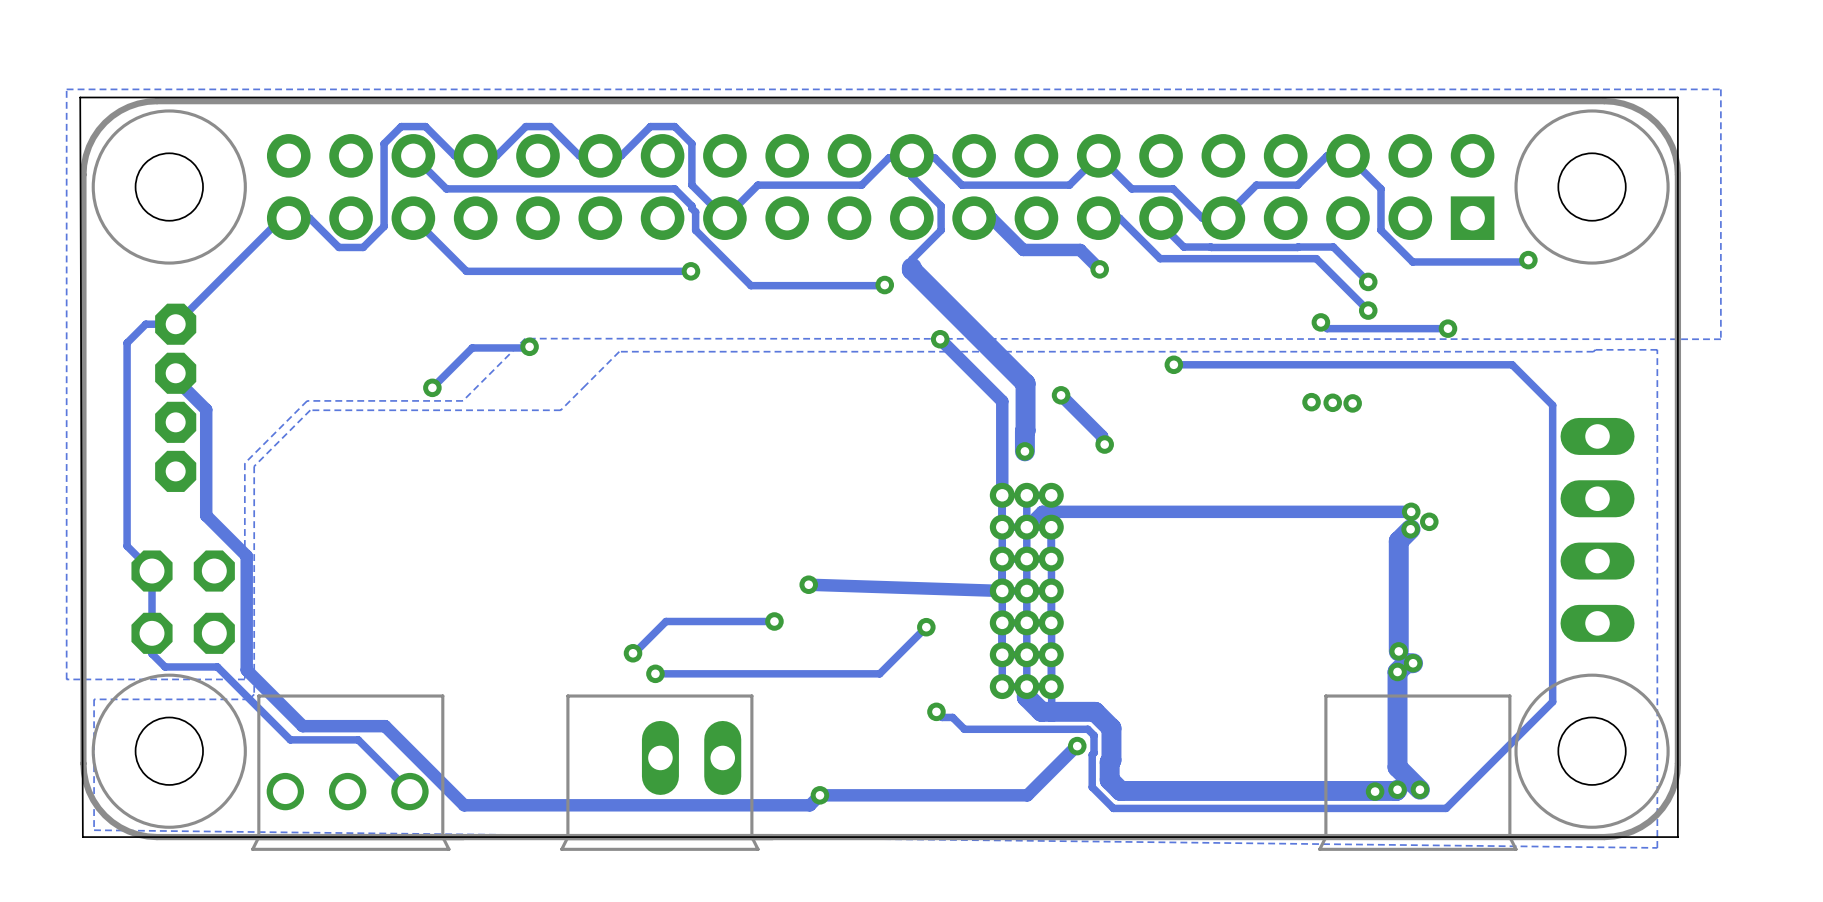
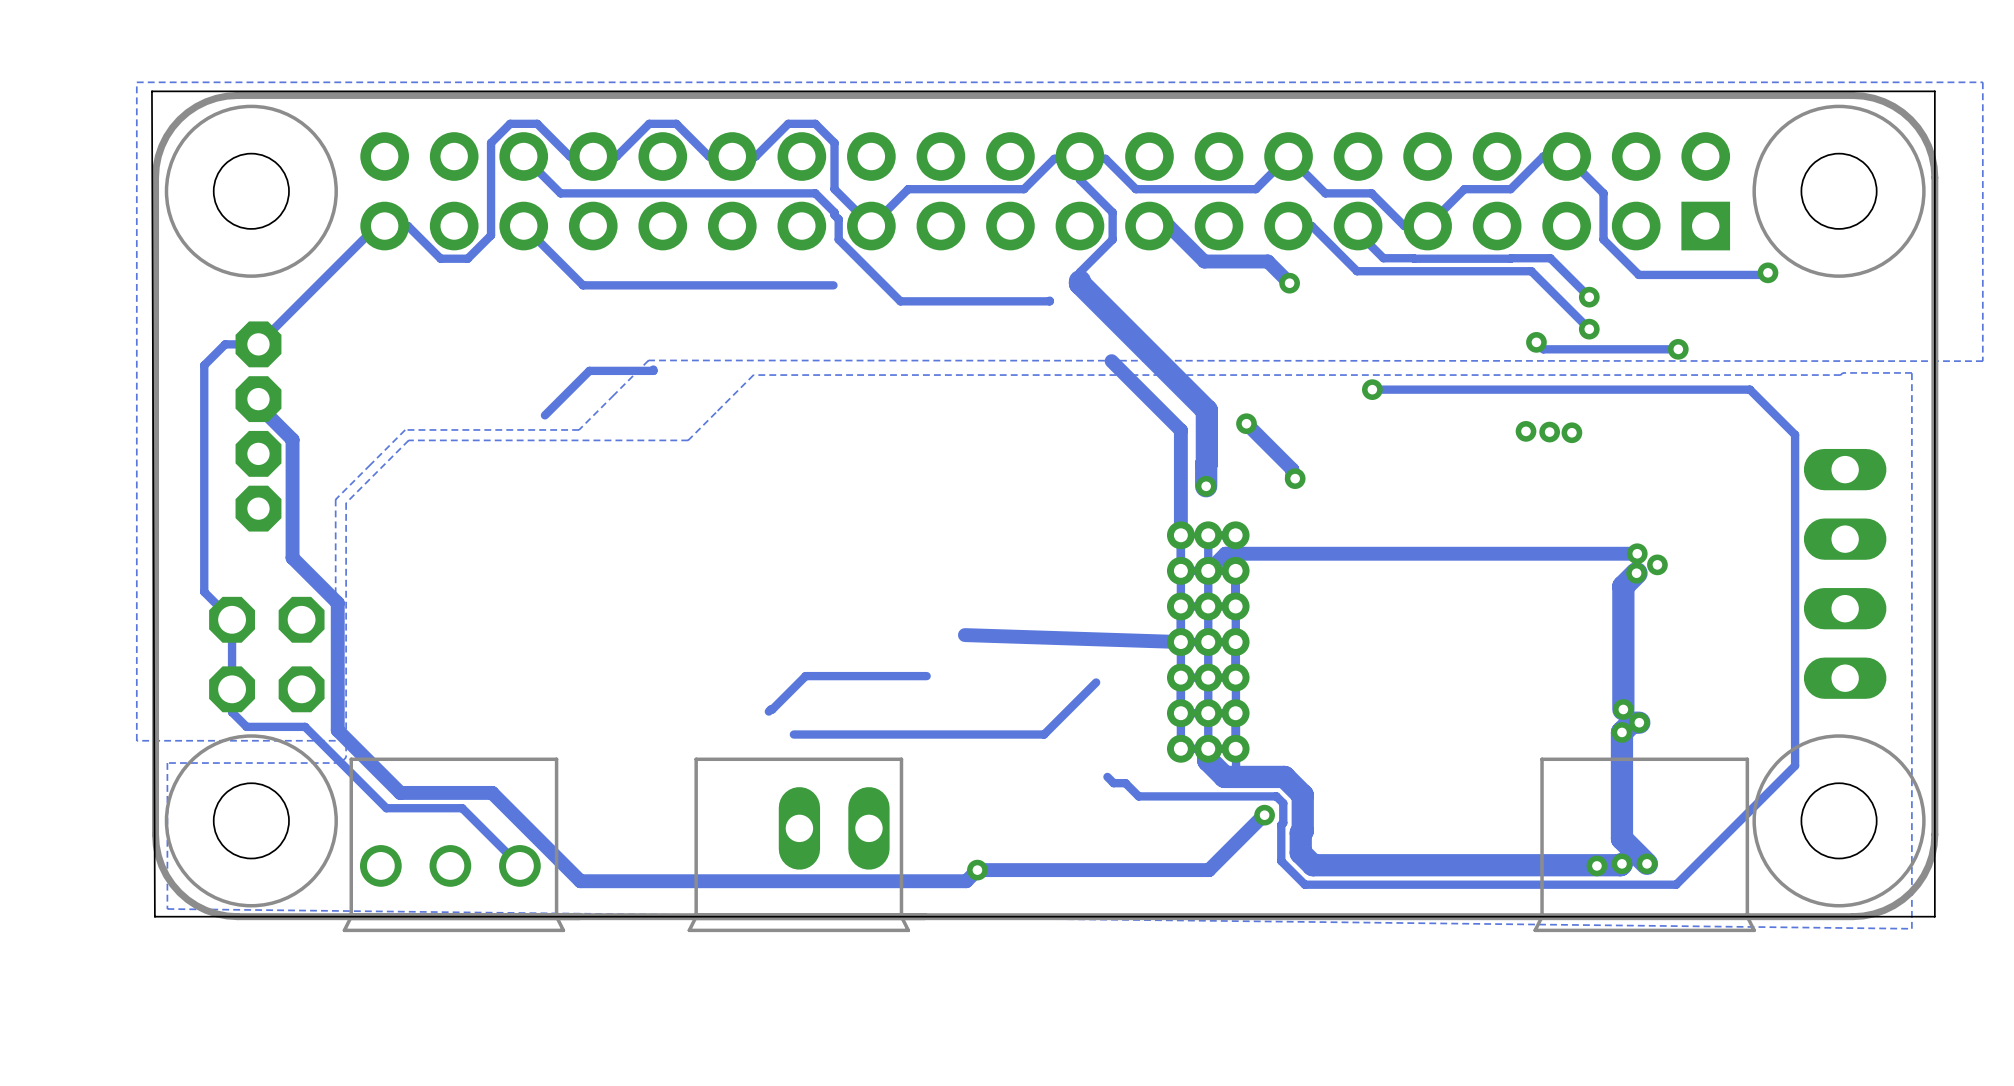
via: (690, 271) -> none
via: (884, 285) -> none
via: (940, 339) -> none
via: (529, 346) -> none
via: (432, 387) -> none
via: (808, 584) -> none
via: (774, 621) -> none
via: (926, 627) -> none
via: (633, 653) -> none
via: (655, 673) -> none
via: (936, 711) -> none

